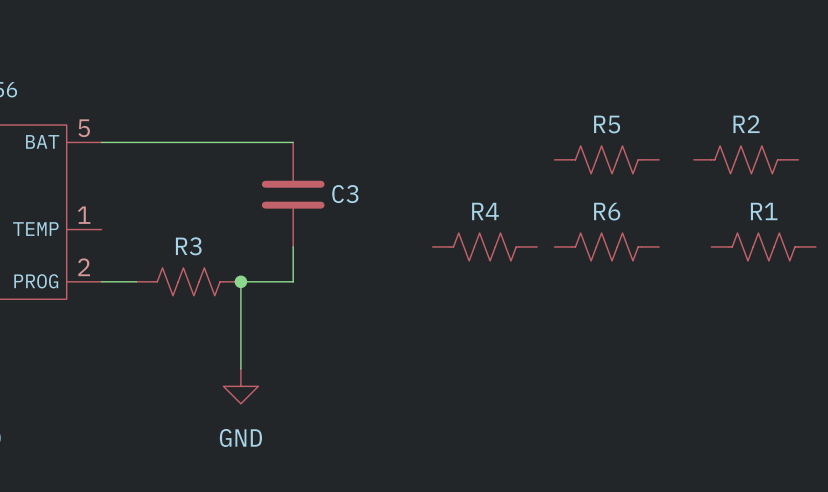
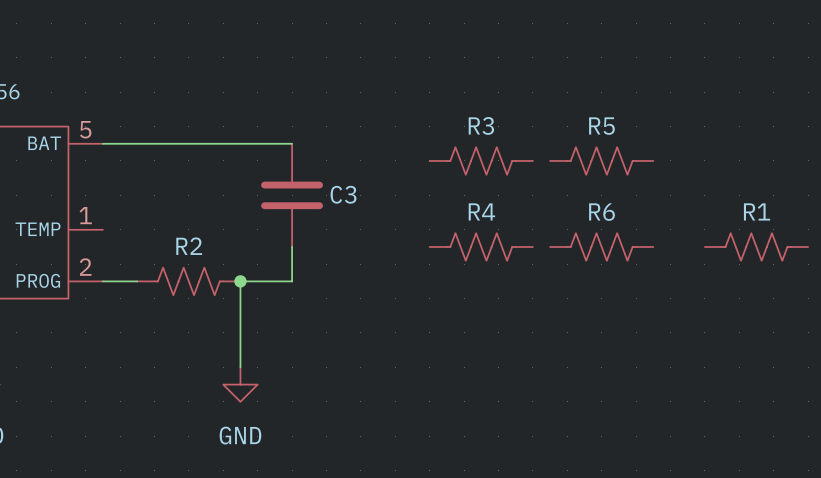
R3: none -> (481, 160)
R2: (746, 159) -> none
R3 name: R3 (188, 246) -> R2 (189, 246)

